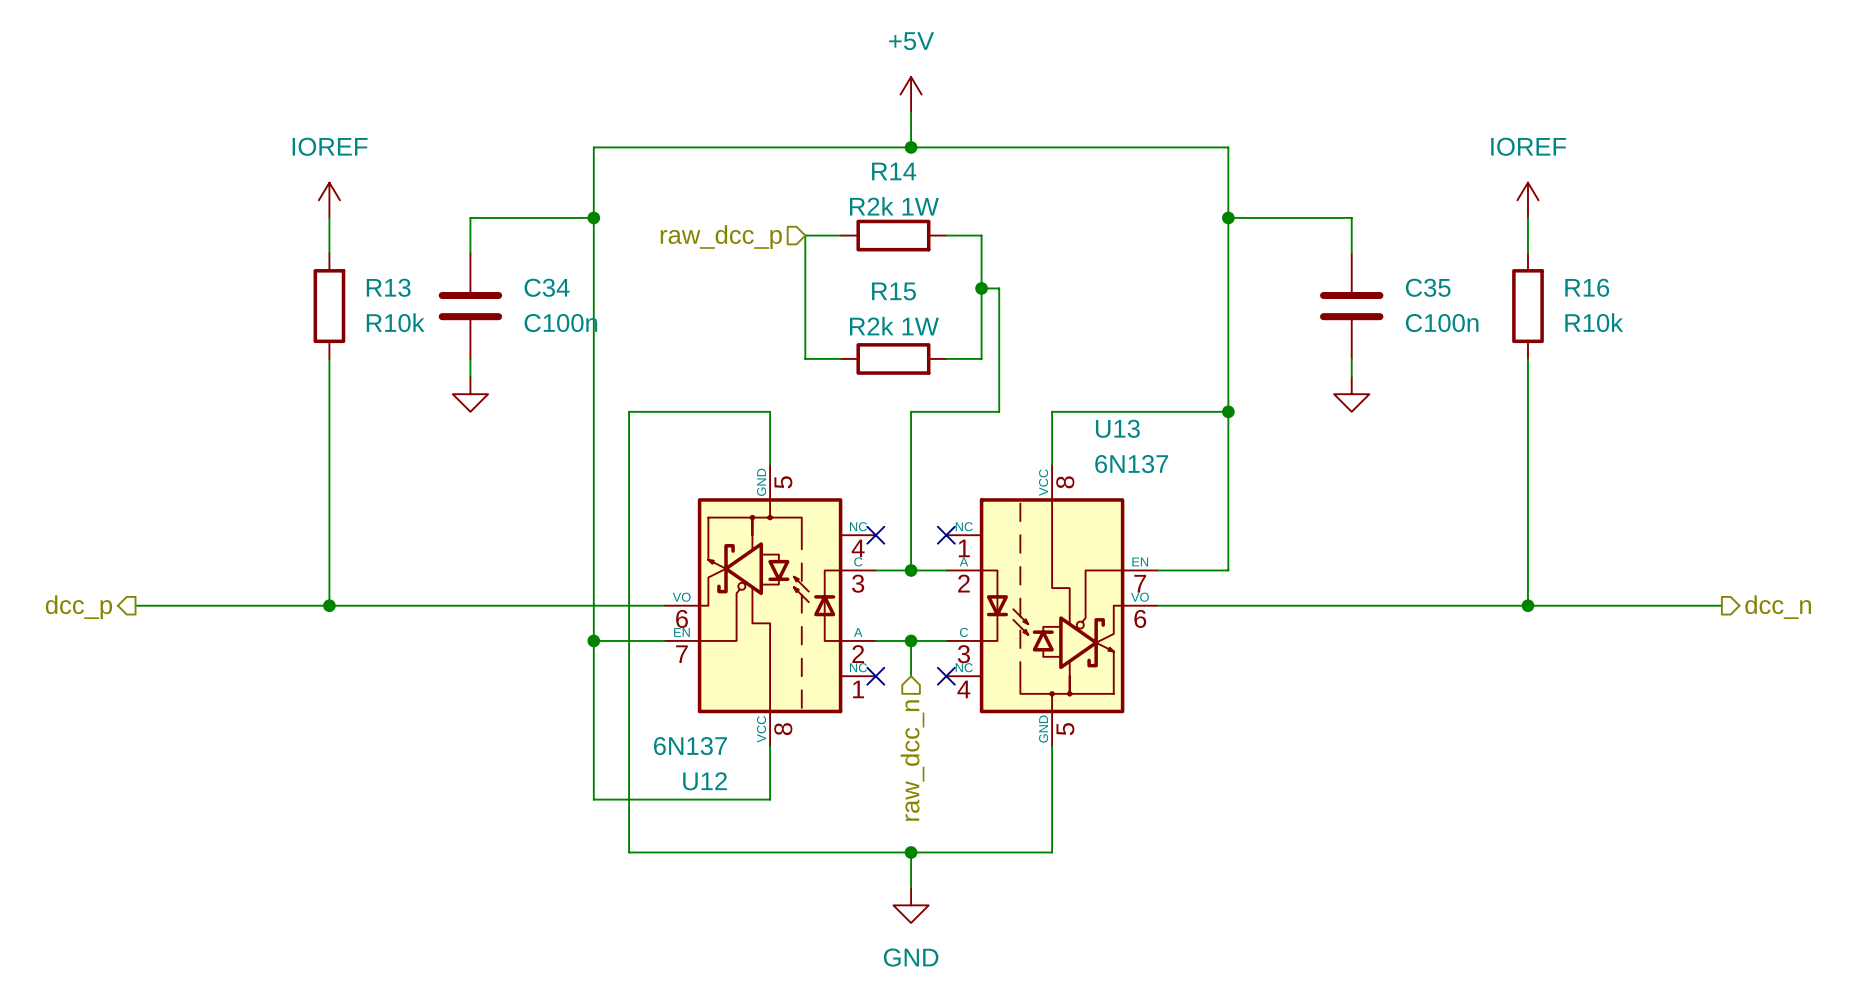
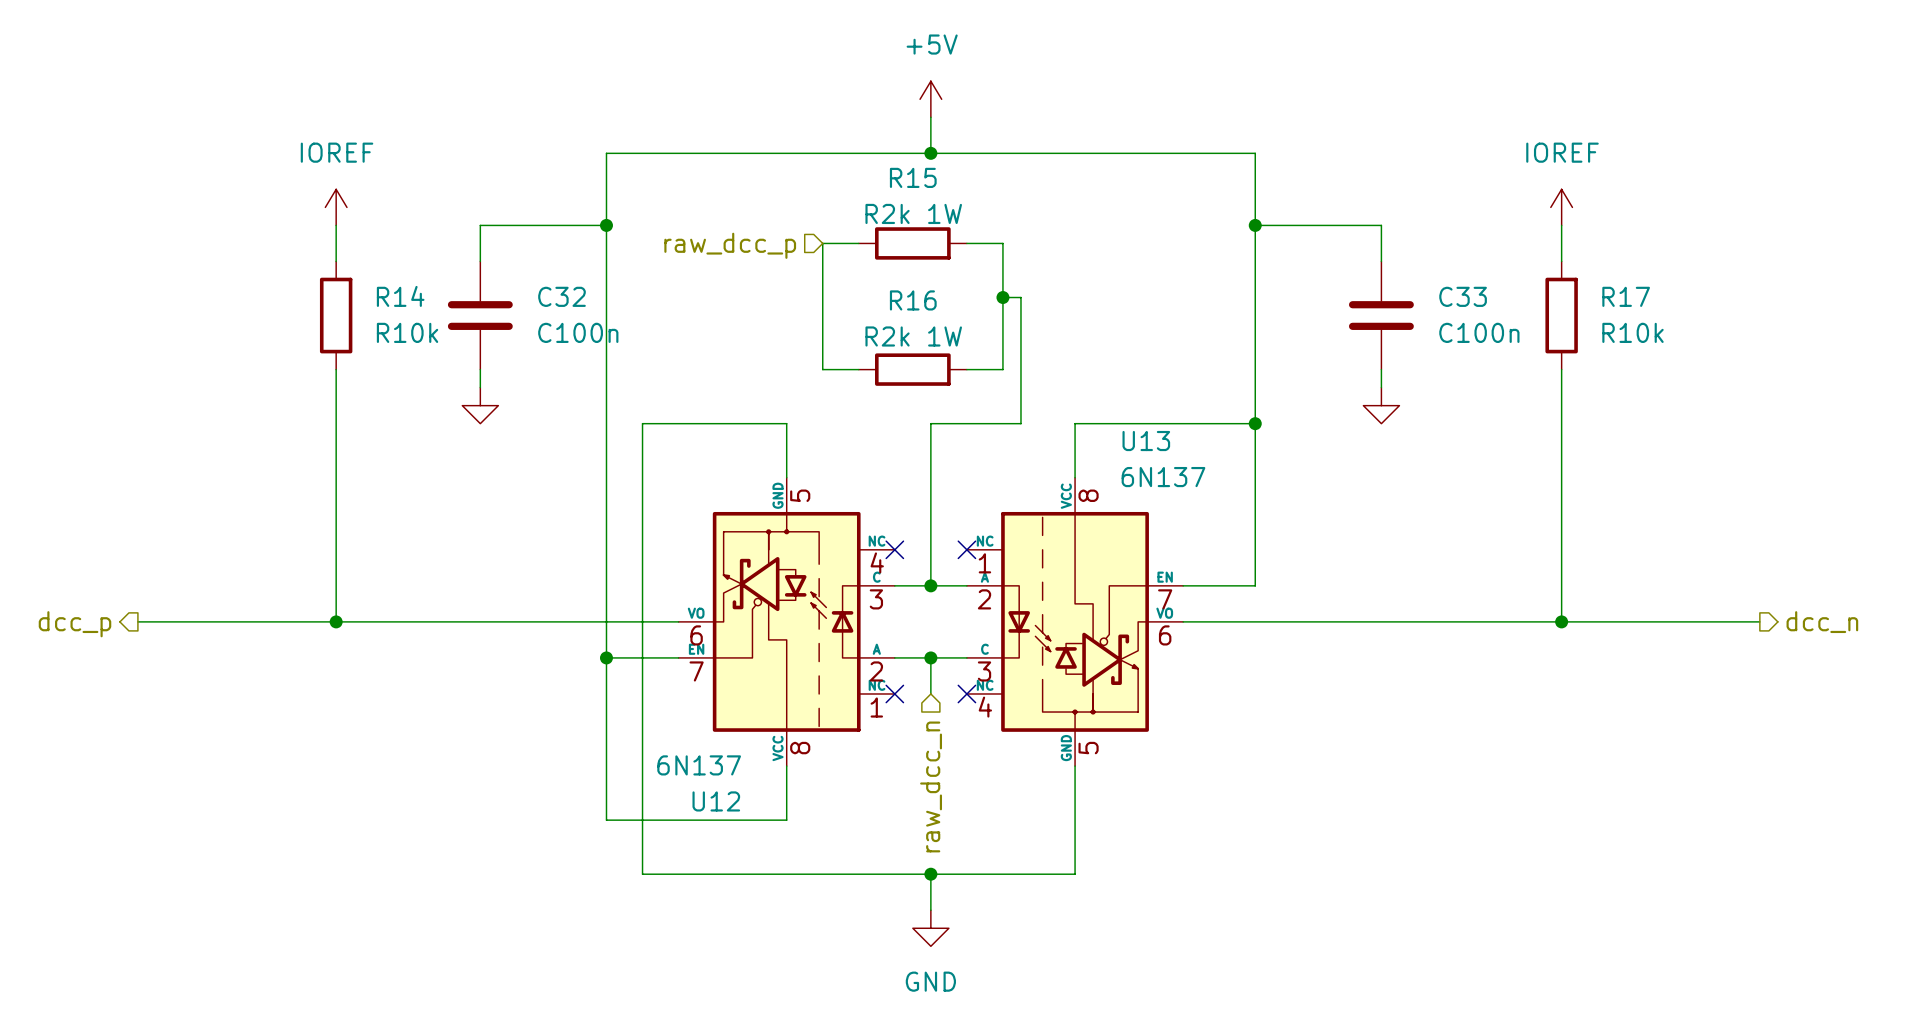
R14 name: R14 (894, 171) -> R15 (913, 177)
R13 name: R13 (388, 287) -> R14 (400, 296)
C34 name: C34 (547, 287) -> C32 (561, 296)
C35 name: C35 (1428, 287) -> C33 (1463, 296)
R16 name: R16 (1587, 287) -> R17 (1626, 296)
R15 name: R15 (893, 291) -> R16 (913, 300)

